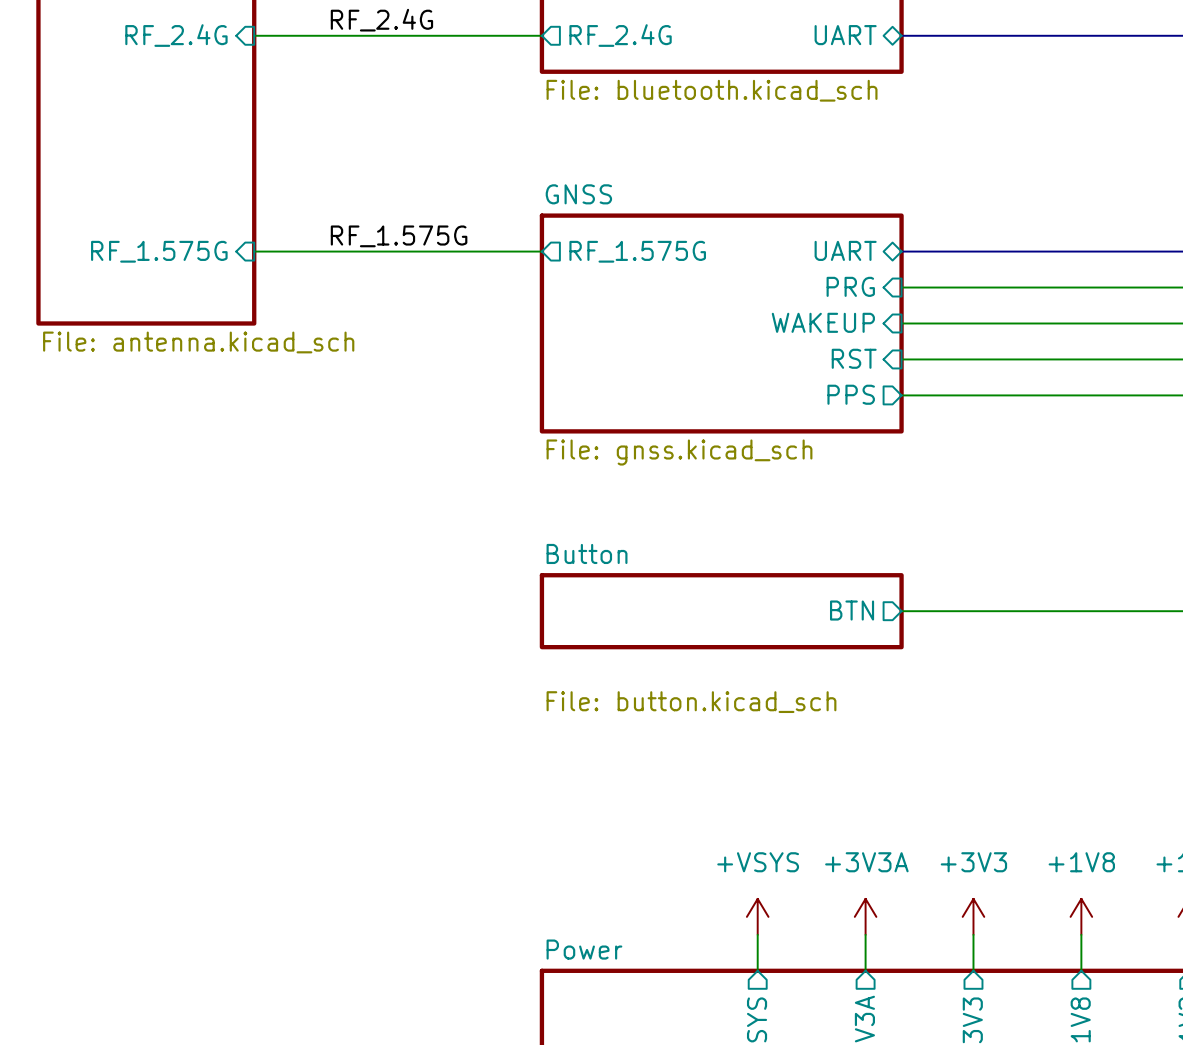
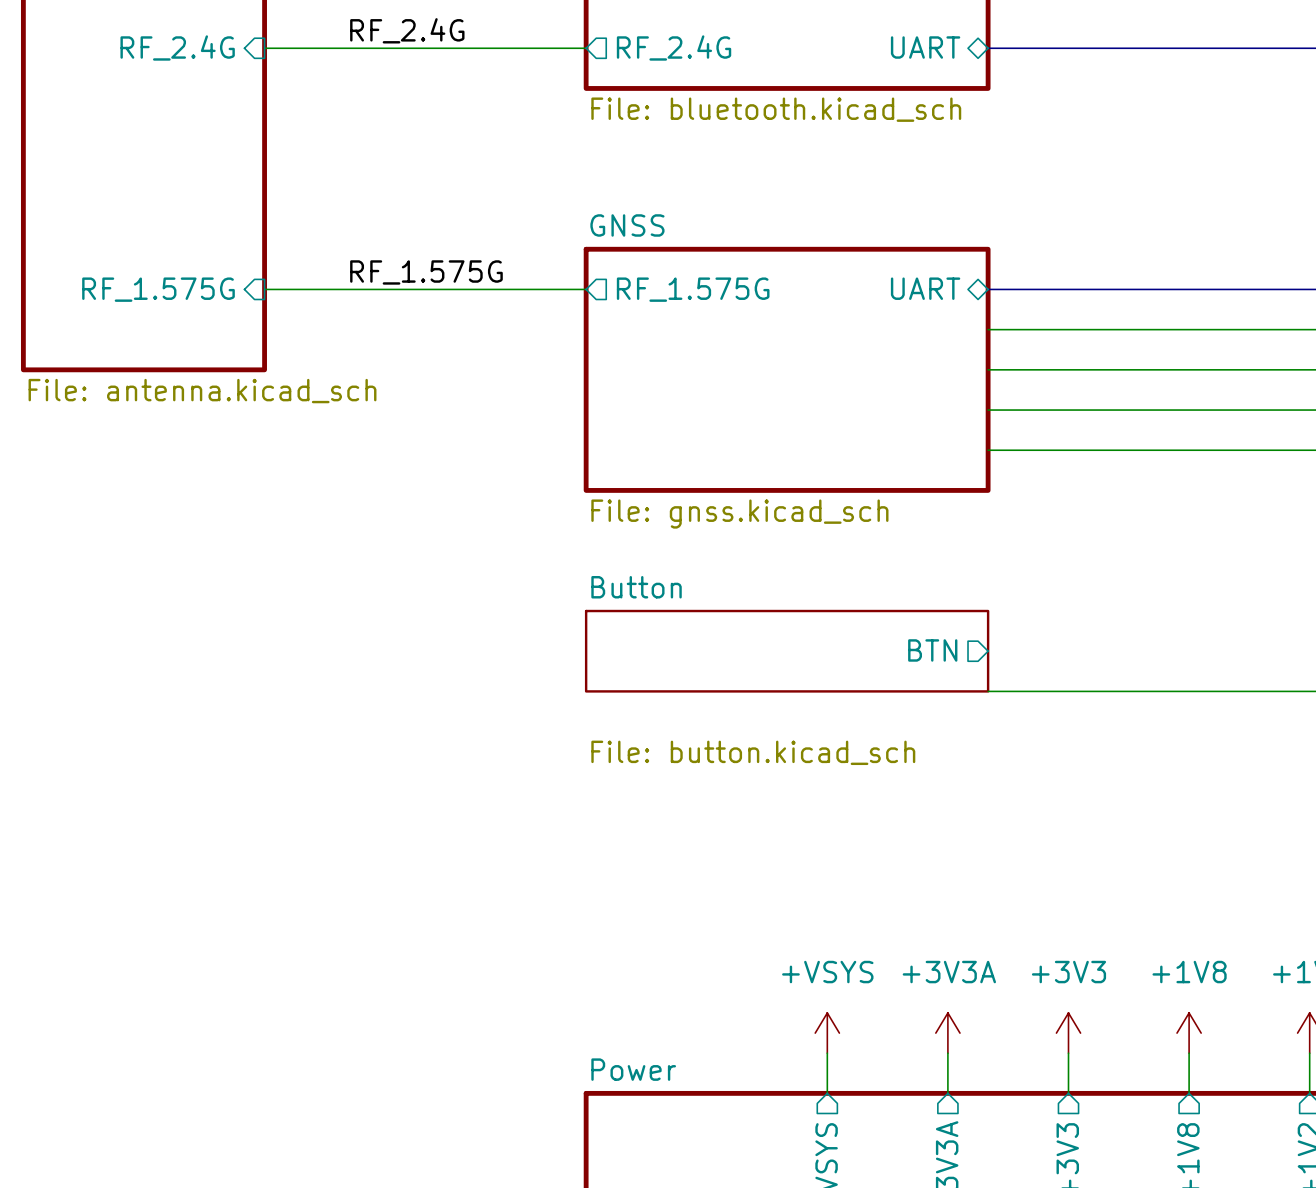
sheet pin: PRG (850, 286) -> none
sheet pin: WAKEUP (823, 322) -> none
sheet pin: RST (854, 358) -> none
sheet pin: PPS (851, 394) -> none
sheet Button: none -> File: button.kicad_sch (787, 651)
sheet pin position: BTN (852, 610) -> BTN (932, 650)
sheet Button: File: button.kicad_sch (721, 611) -> none

